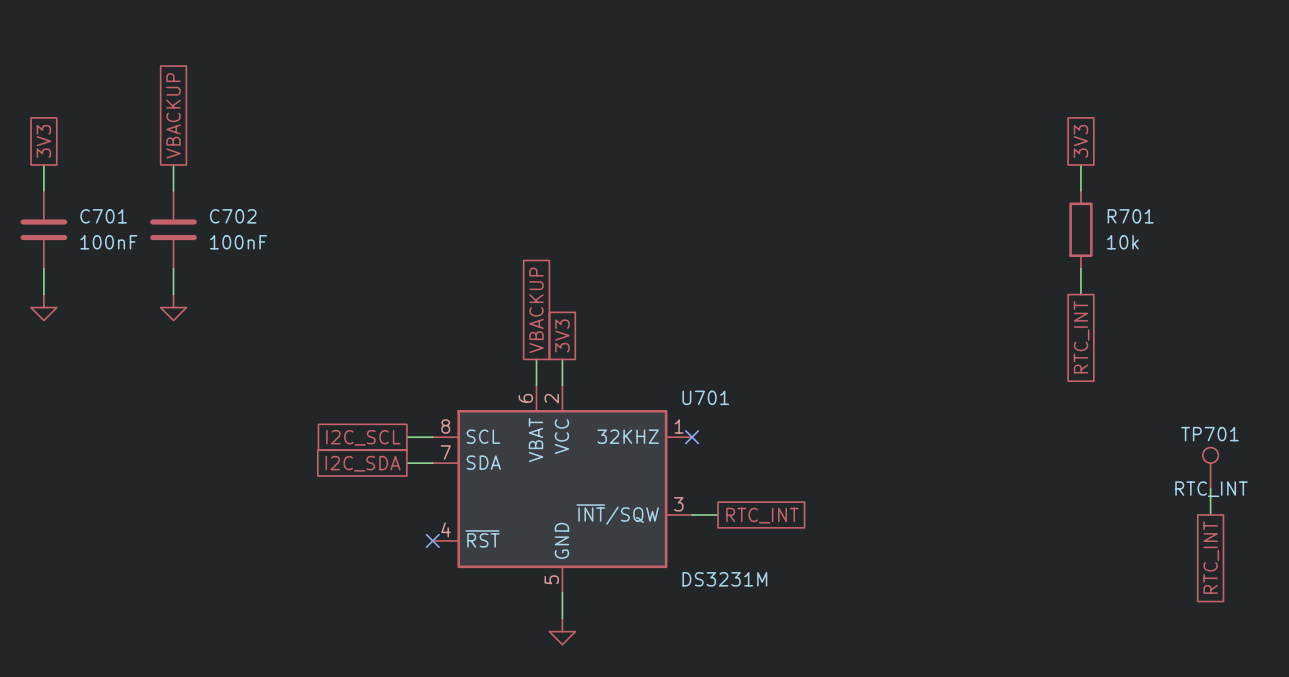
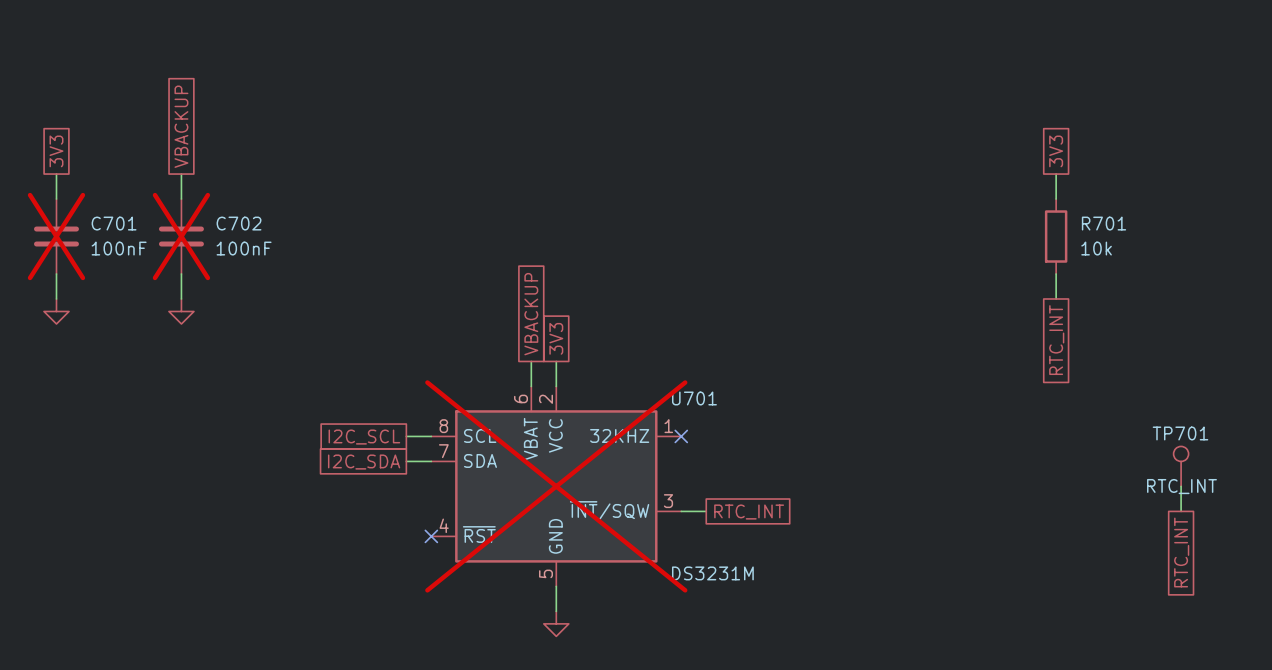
C701 do-not-place cross: none -> (56, 236)
C702 do-not-place cross: none -> (181, 236)
U701 do-not-place cross: none -> (556, 486)

